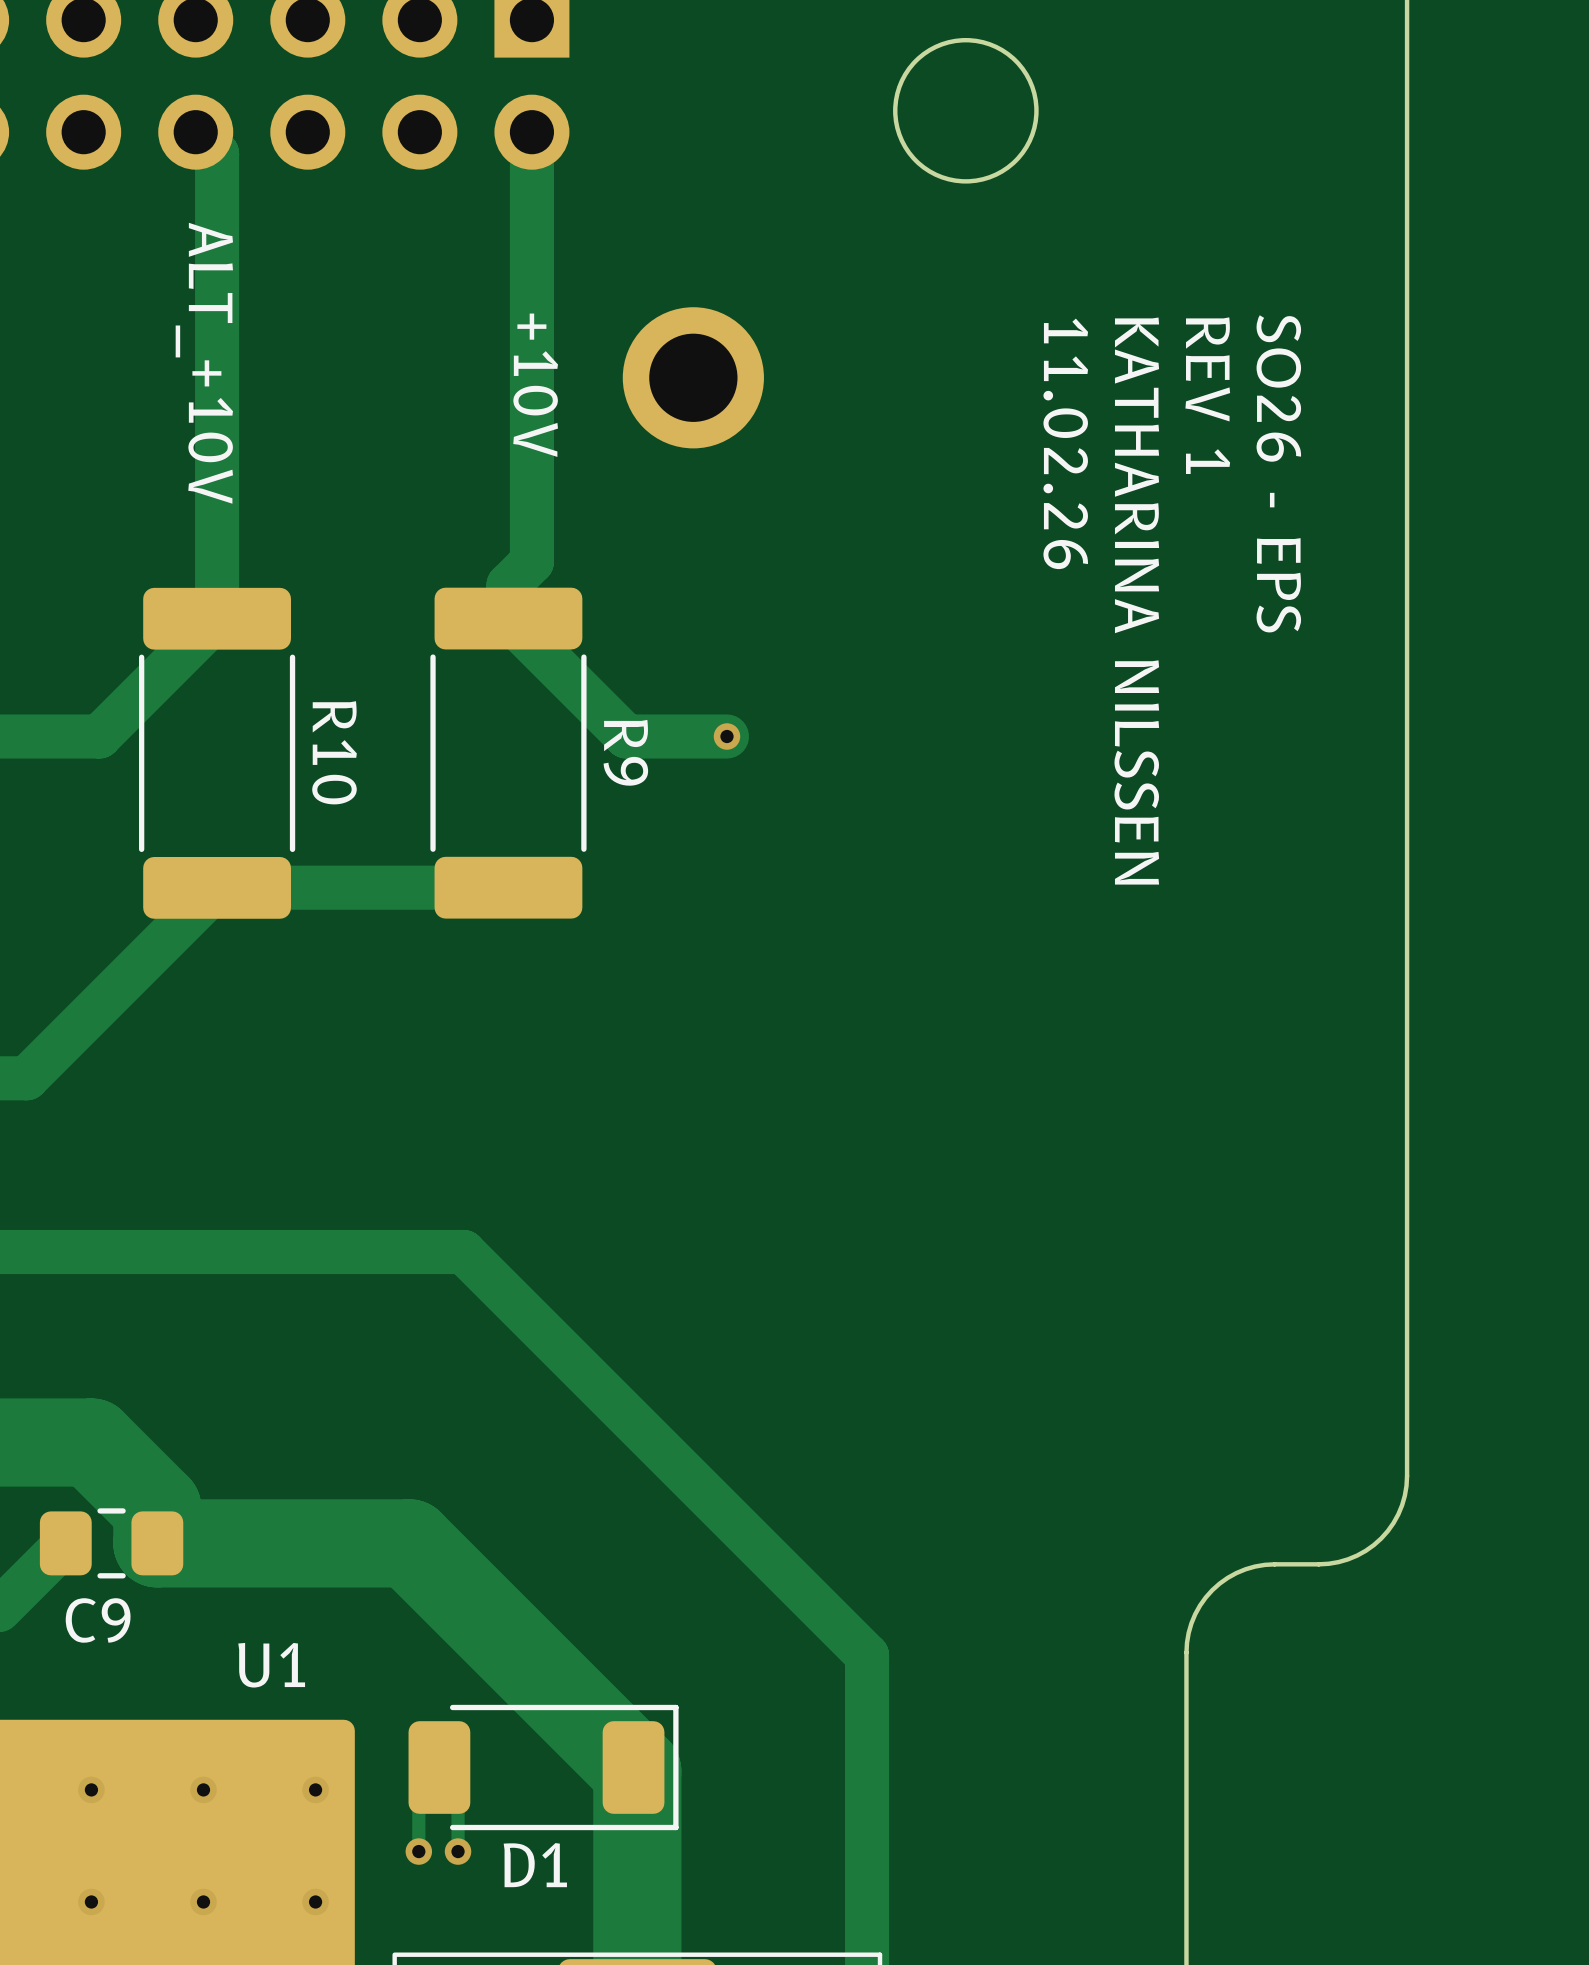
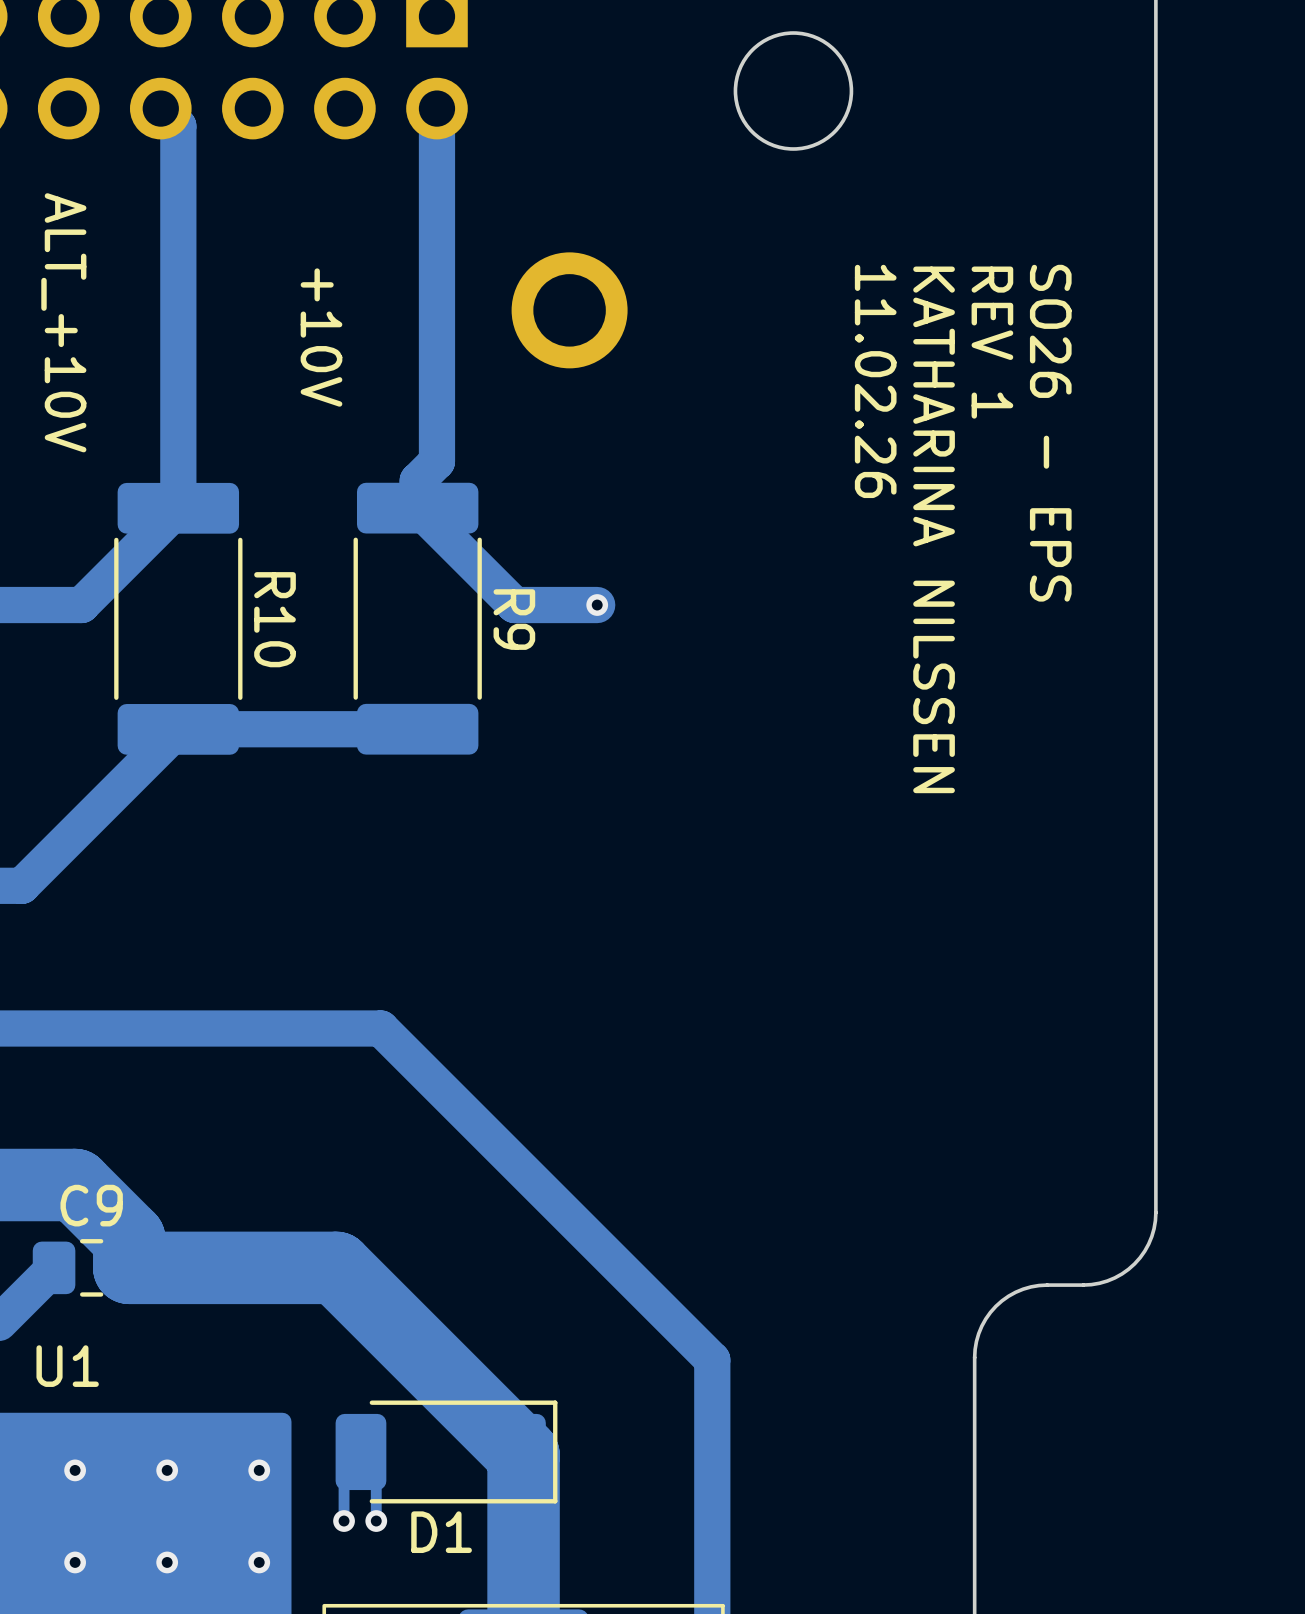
text position: ALT_+10V (204, 363) -> ALT_+10V (63, 322)
text position: +10V (535, 385) -> +10V (321, 337)
C9 name position: C9 (98, 1620) -> C9 (91, 1205)
U1 name position: U1 (271, 1665) -> U1 (67, 1366)

